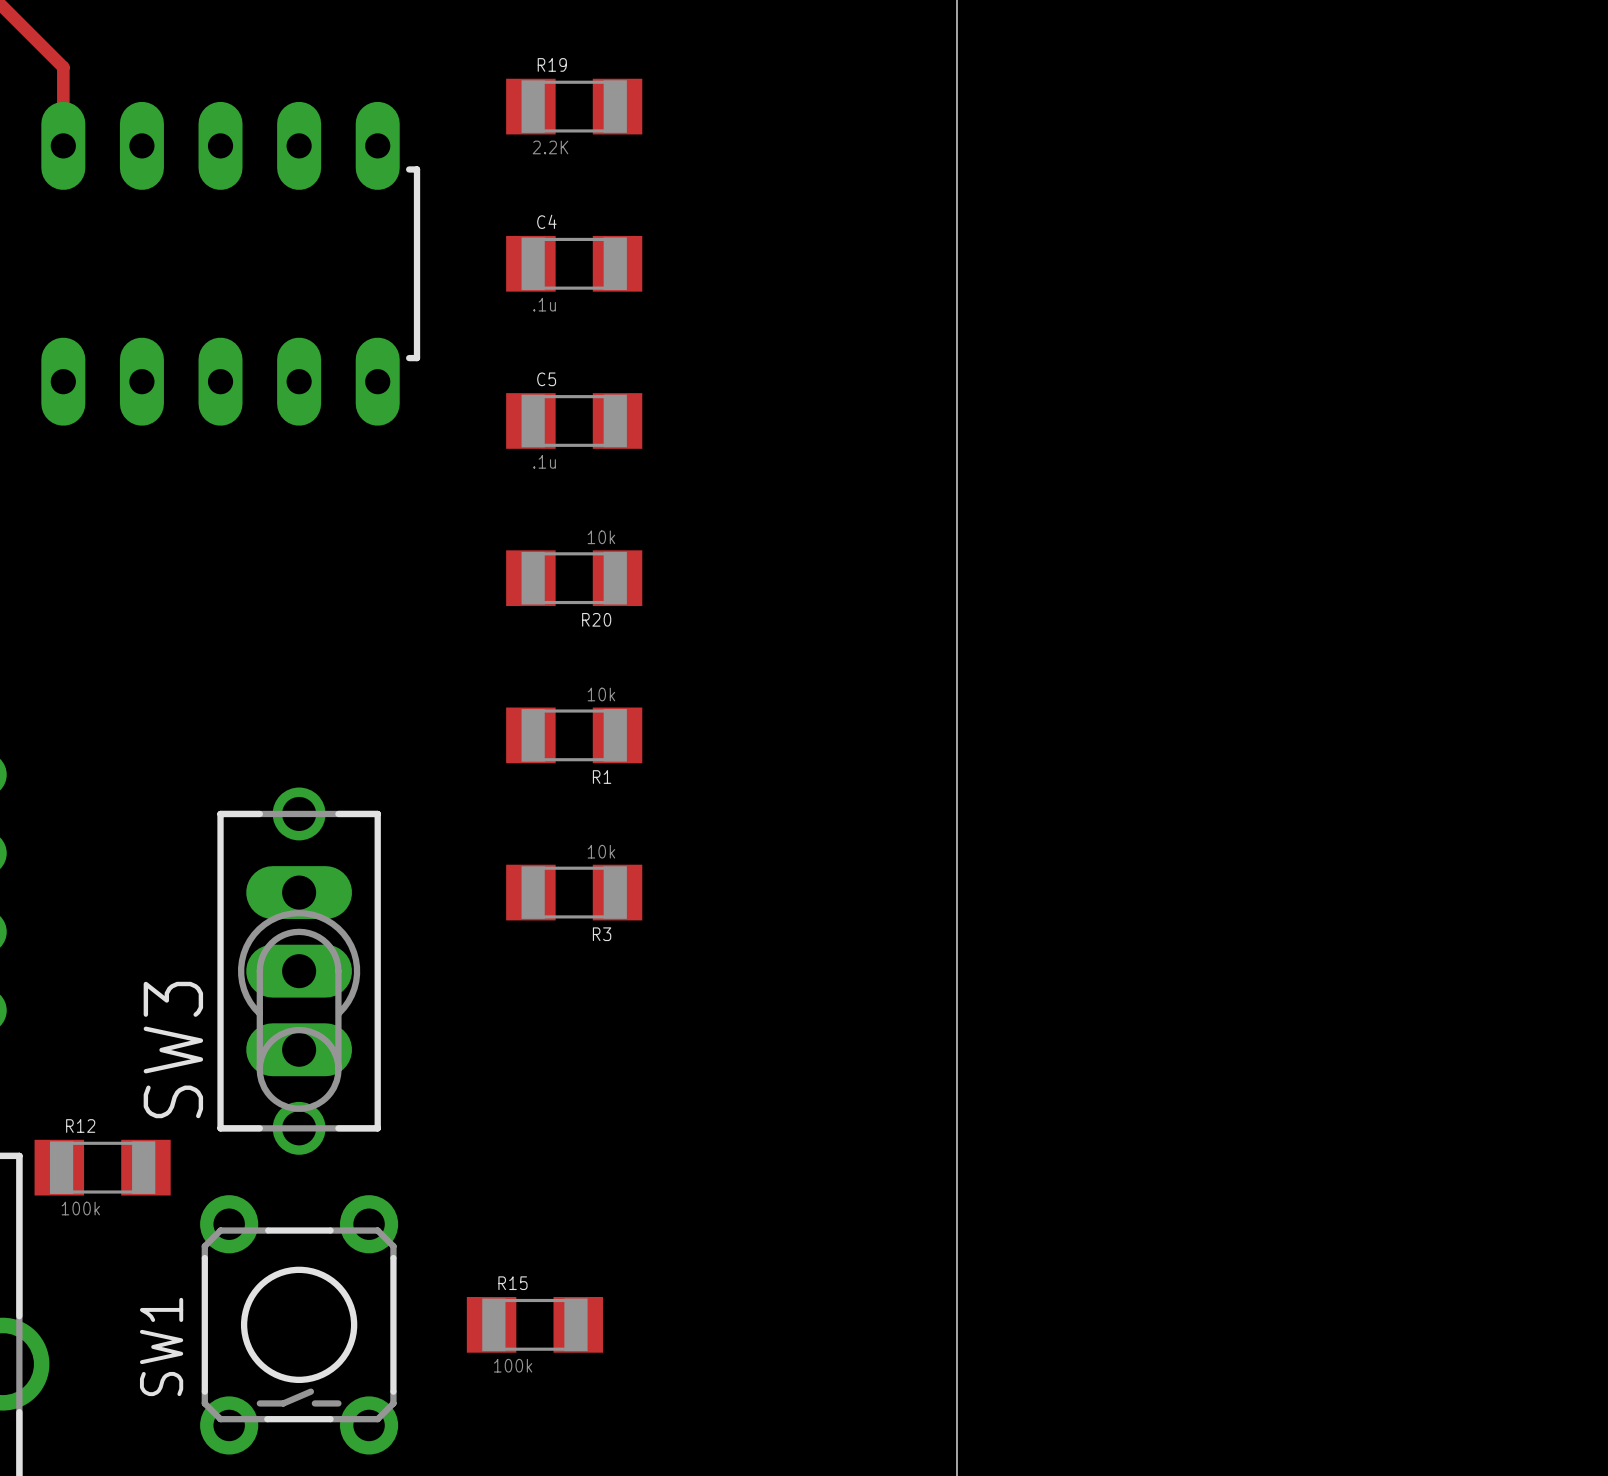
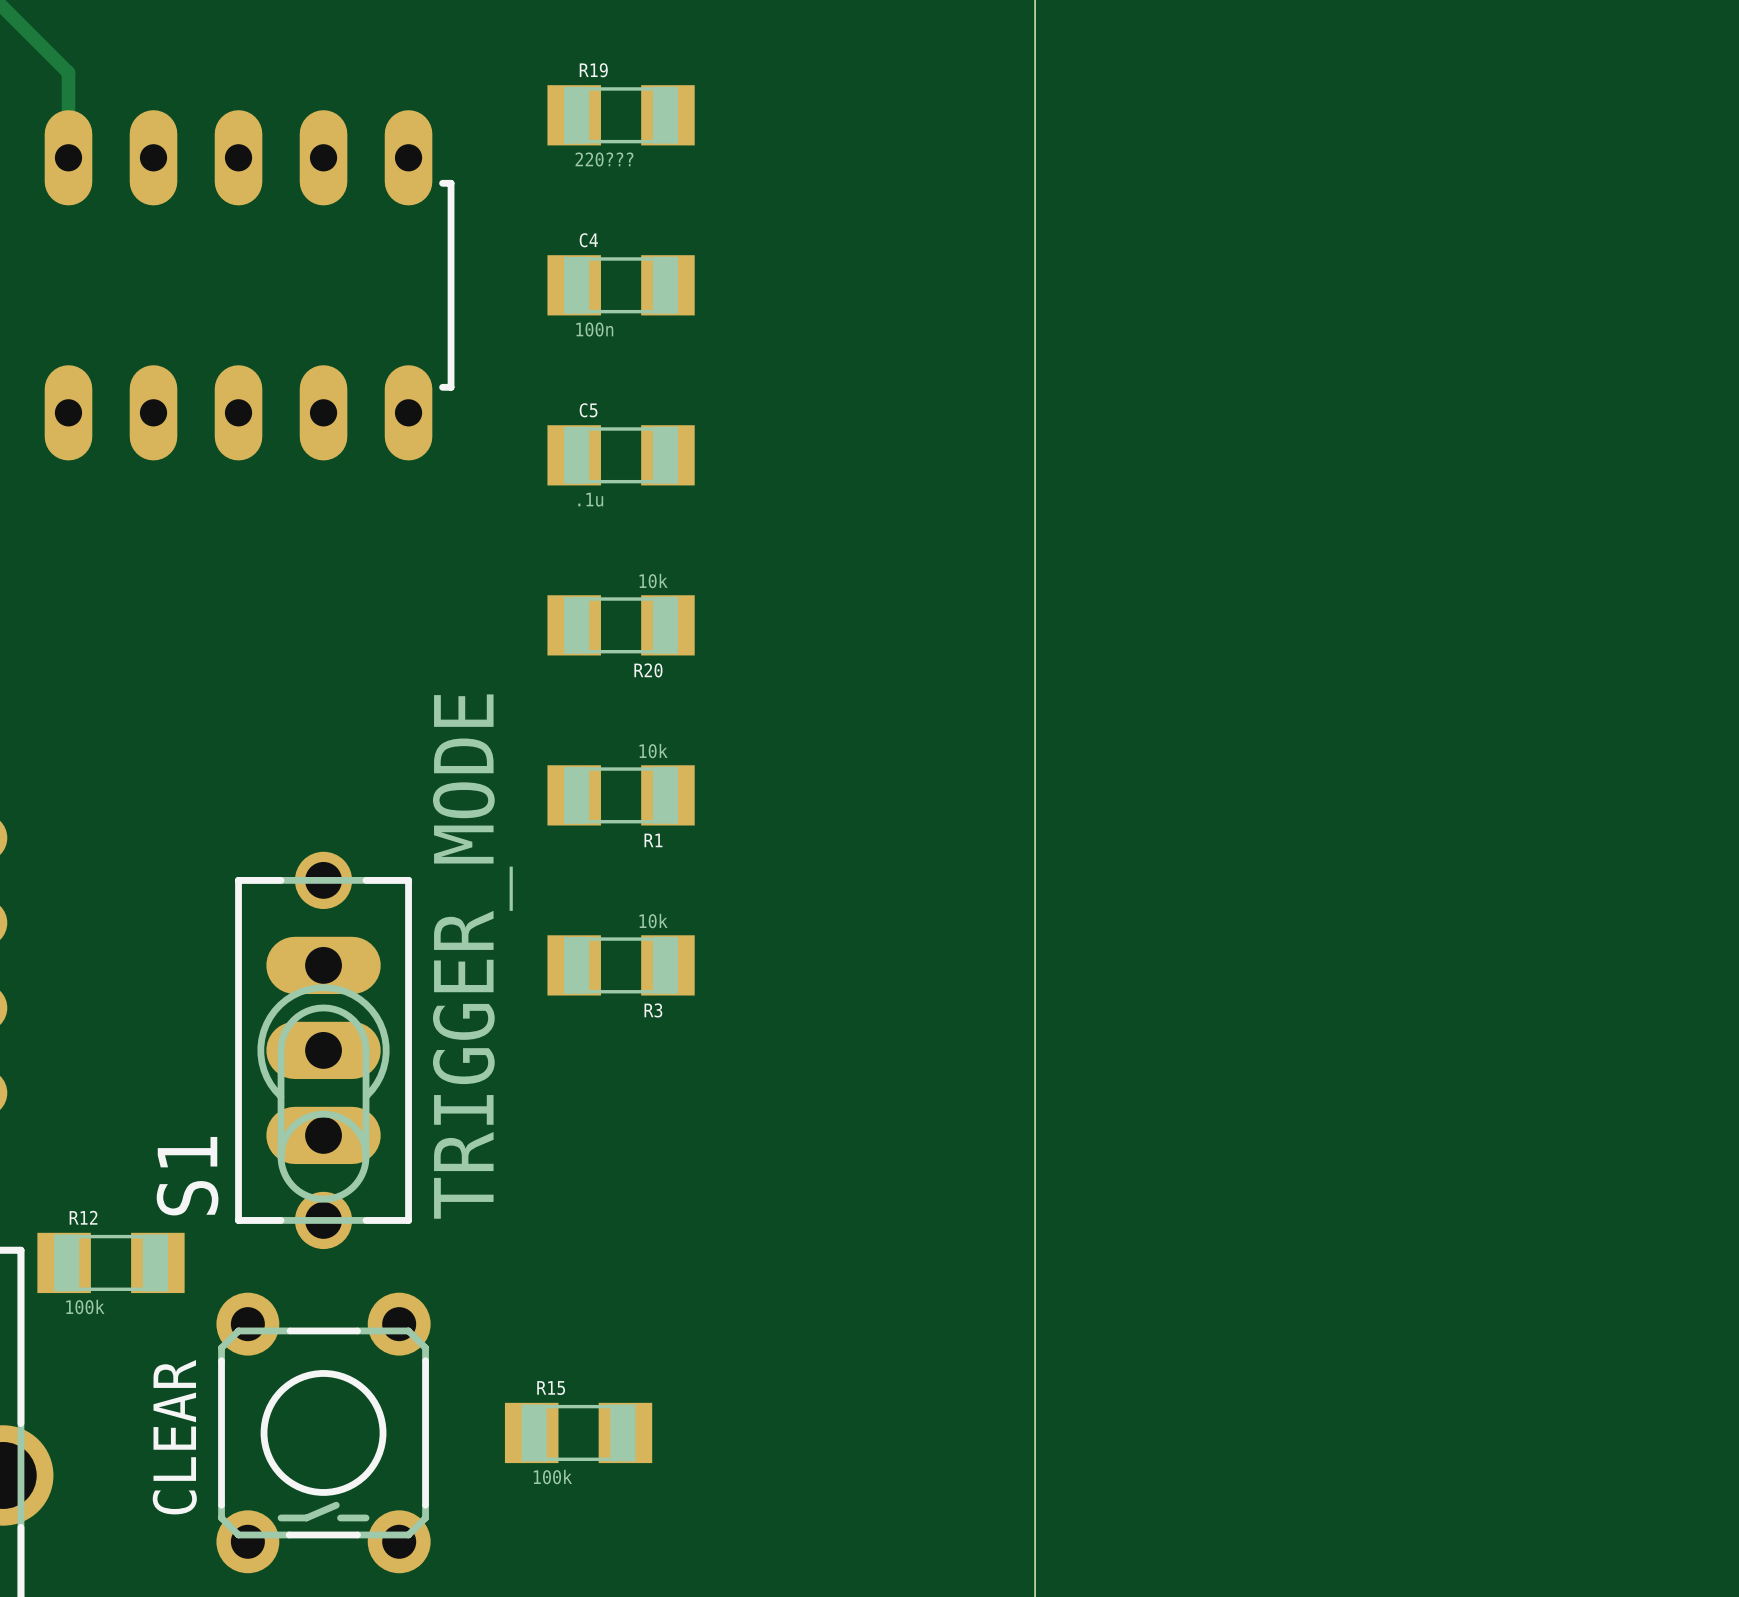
R19 value: 2.2K (550, 147) -> 220??? (604, 159)
C4 value: .1u (544, 304) -> 100n (594, 329)
SW3 value: none -> TRIGGER_MODE (472, 956)
SW3 name: SW3 (173, 1050) -> S1 (187, 1176)
SW1 name: SW1 (161, 1346) -> CLEAR (174, 1437)

